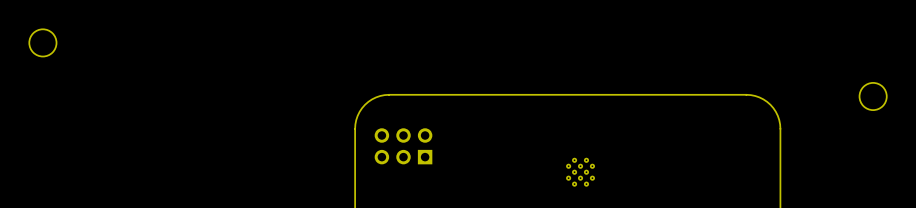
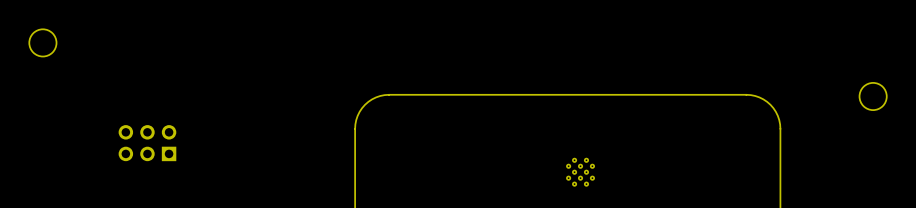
part: none -> (147, 143)
part: (403, 146) -> none

